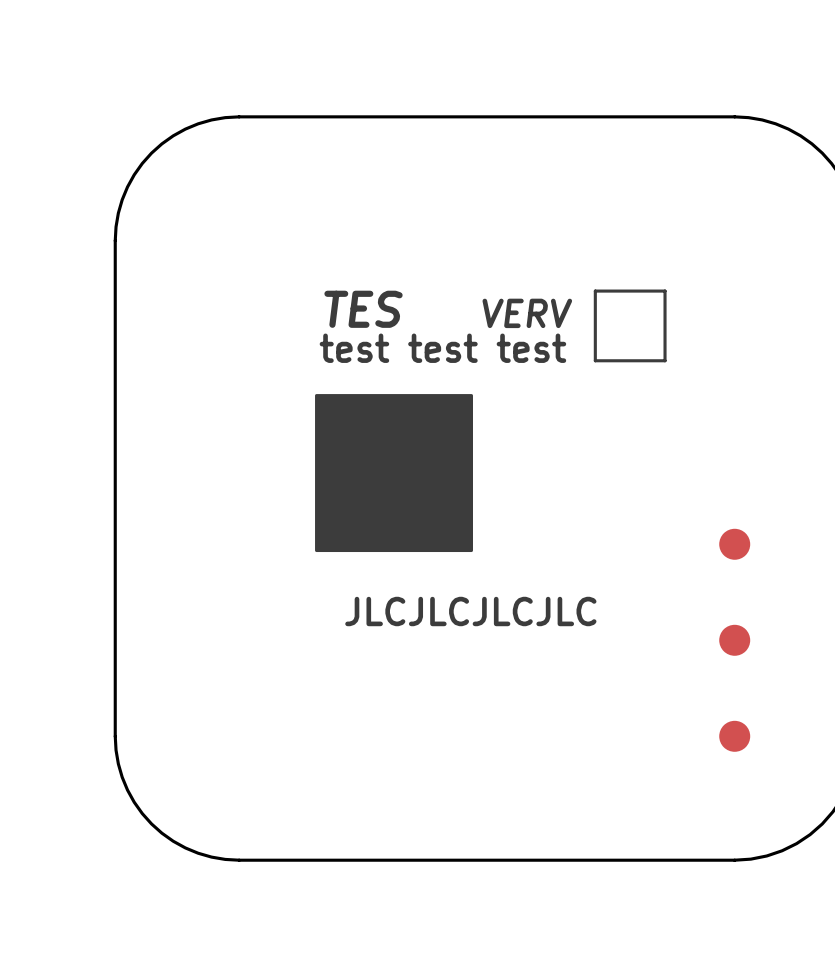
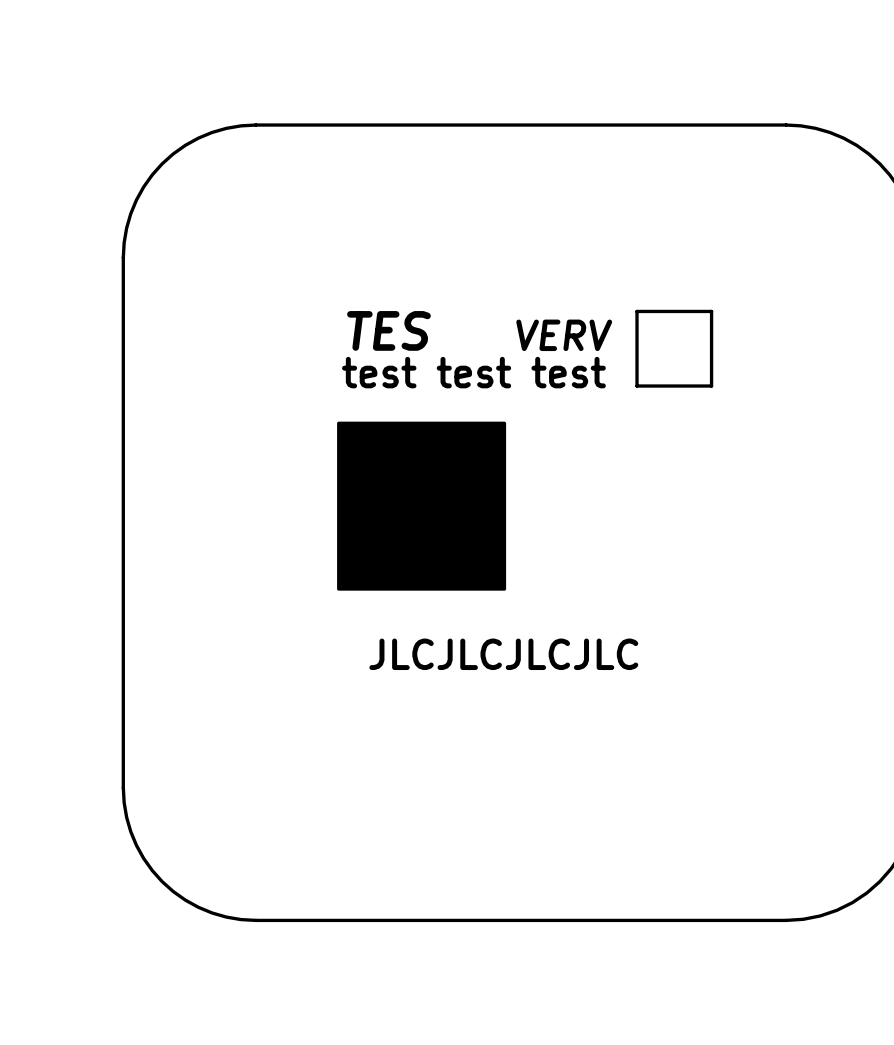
part: (734, 544) -> none
part: (734, 640) -> none
part: (734, 736) -> none

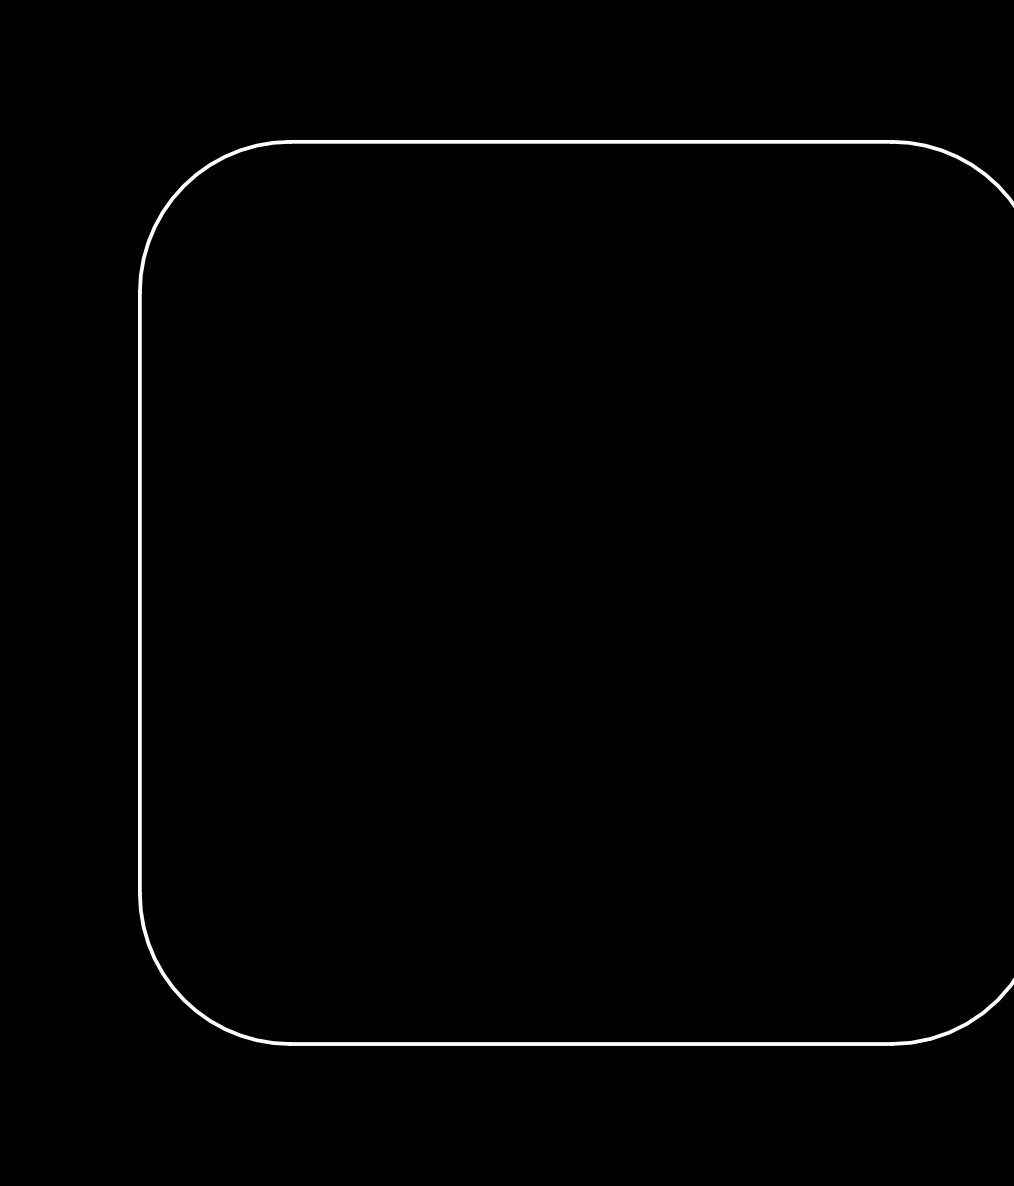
line: (637, 311) (637, 386) (711, 386) (711, 311) (637, 311) -> none
text: TES (388, 330) -> none
text: VERV (564, 335) -> none
text: test test test (473, 372) -> none
drawing: [337, 421, 507, 591] -> none
text: JLCJLCJLCJLC (503, 654) -> none

